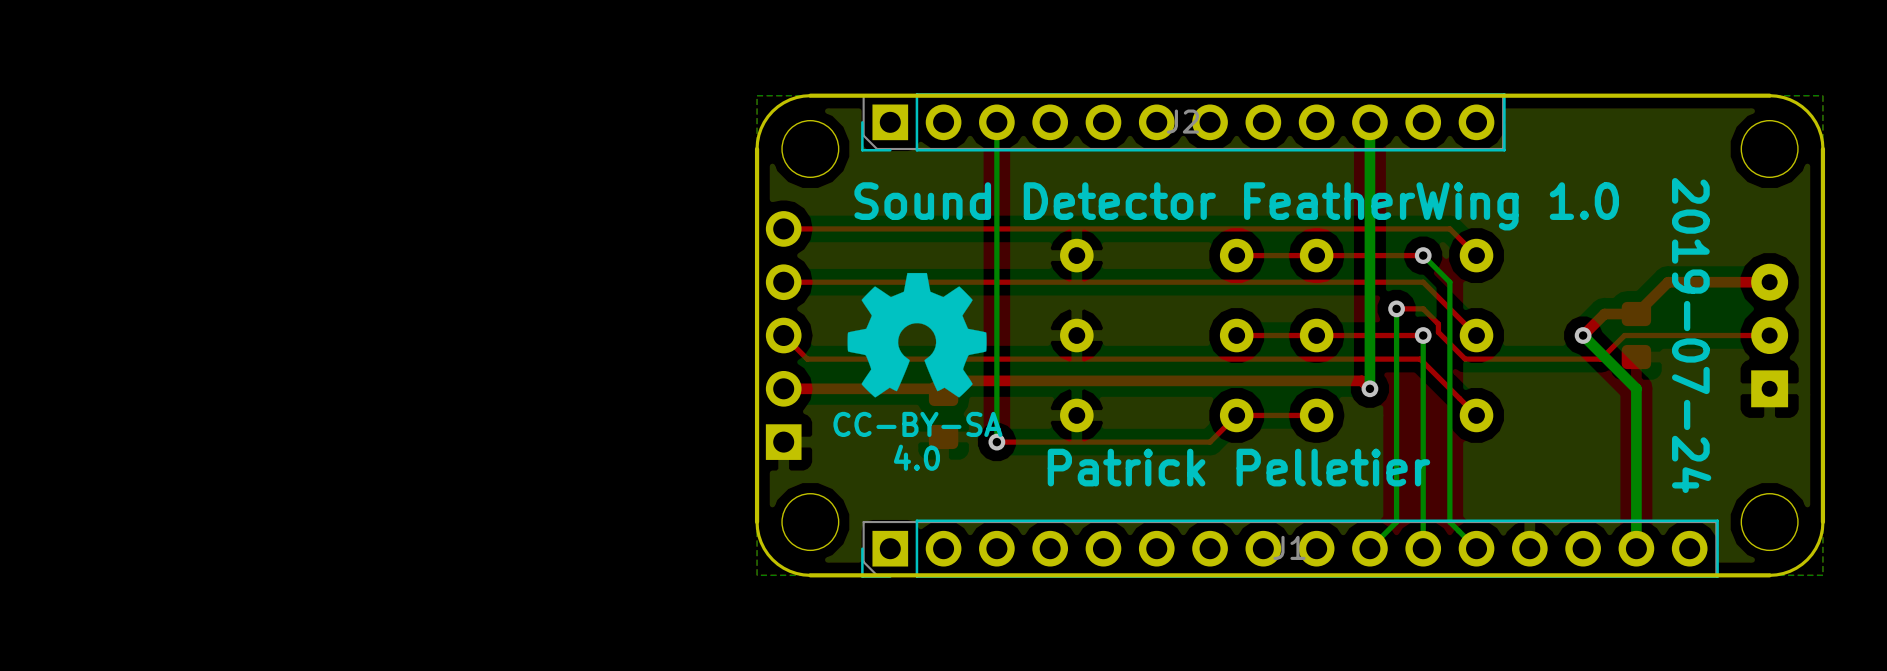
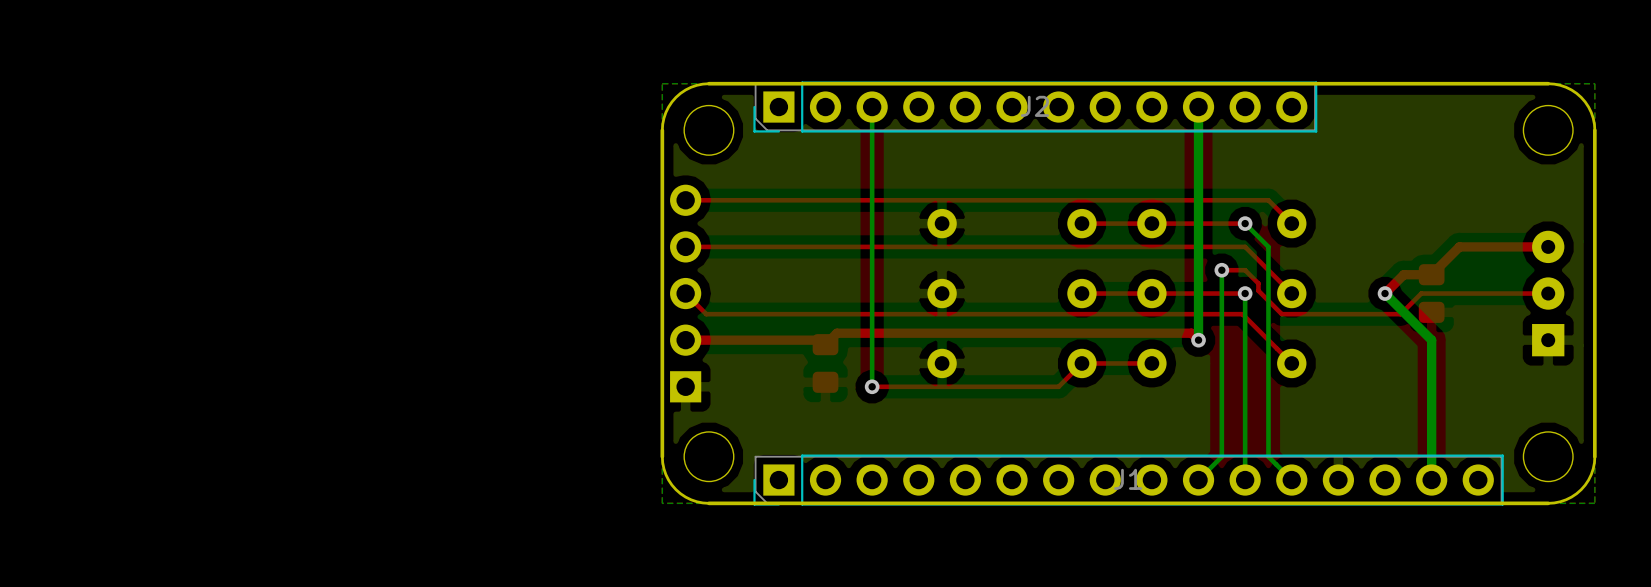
text: Sound Detector FeatherWing 1.0 (1236, 206) -> none
drawing: [847, 272, 987, 398] -> none
text: 2019-07-24 (1691, 335) -> none
text: CC-BY-SA (917, 424) -> none
text: 4.0 (916, 457) -> none
text: Patrick Pelletier (1238, 467) -> none

